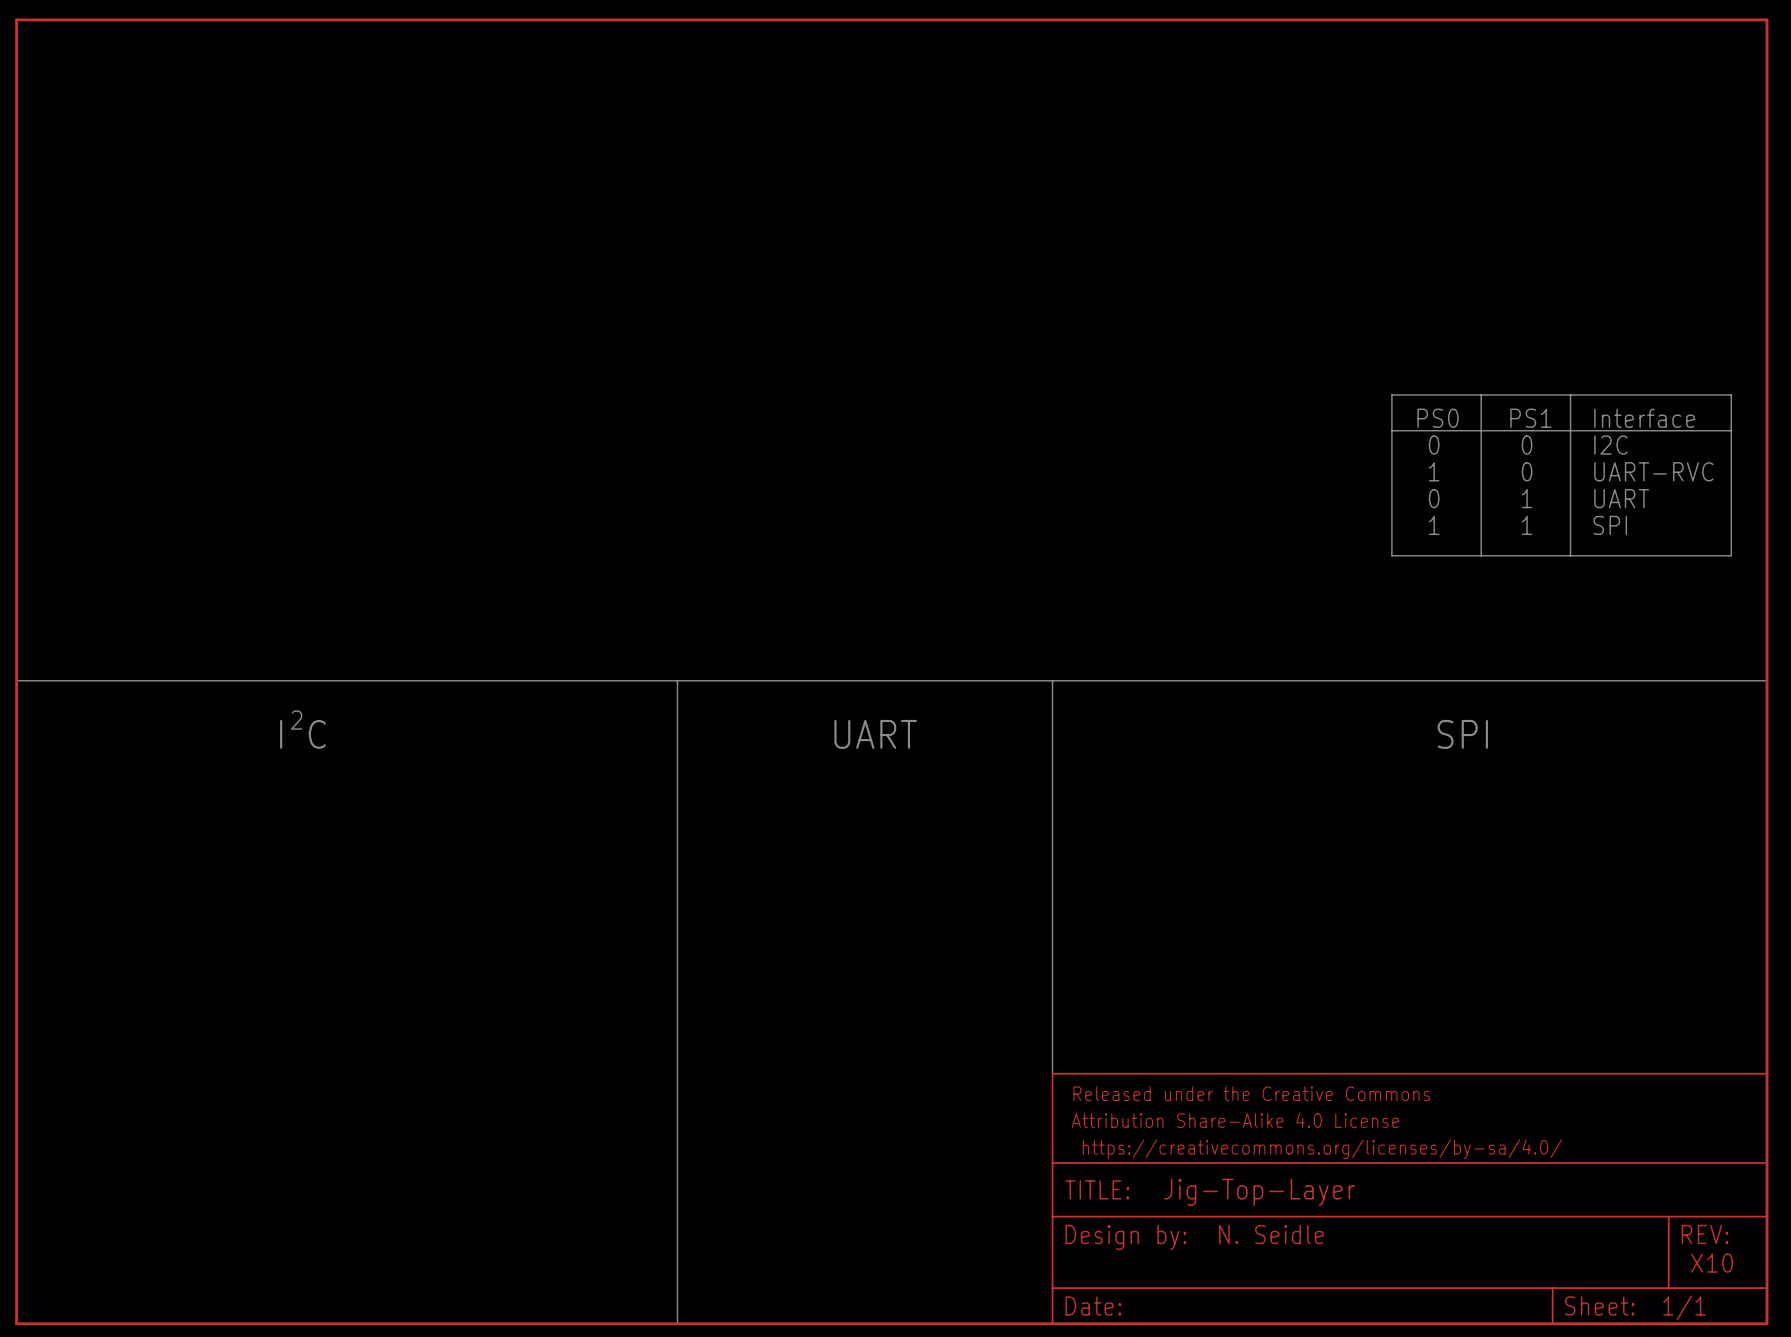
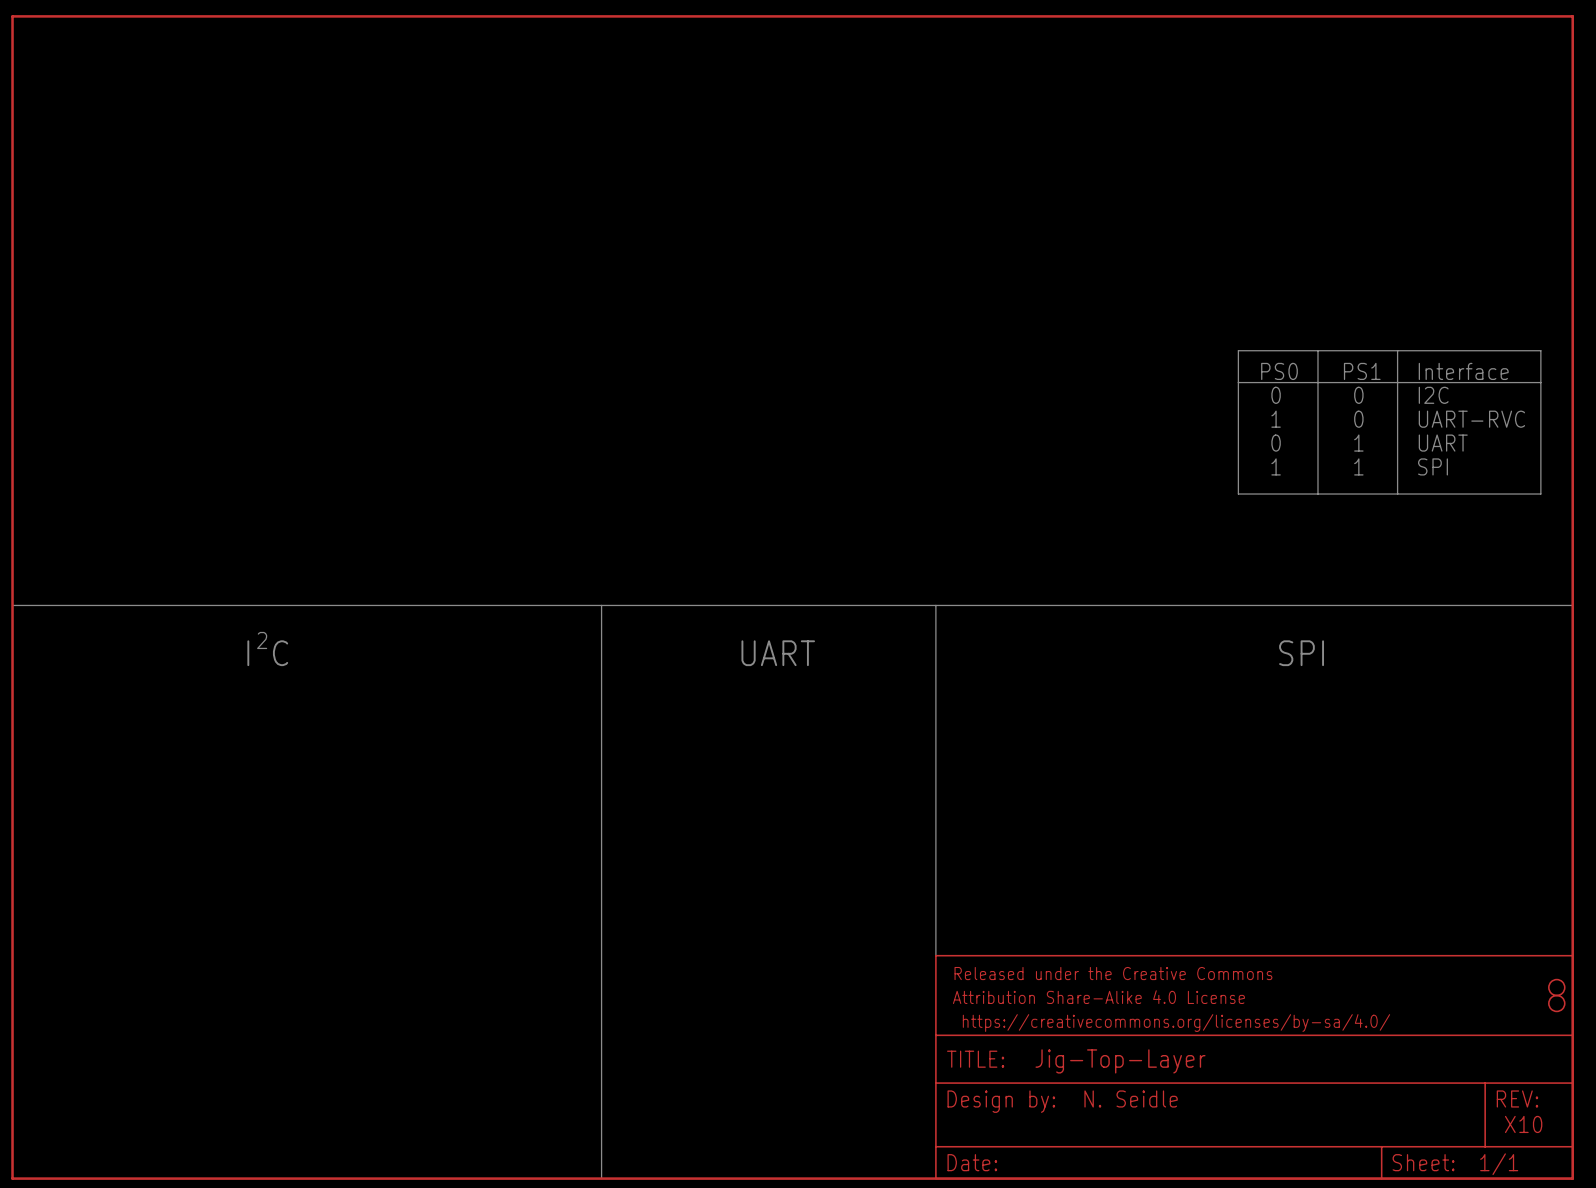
part: none -> (1556, 987)
part: none -> (1556, 1003)

